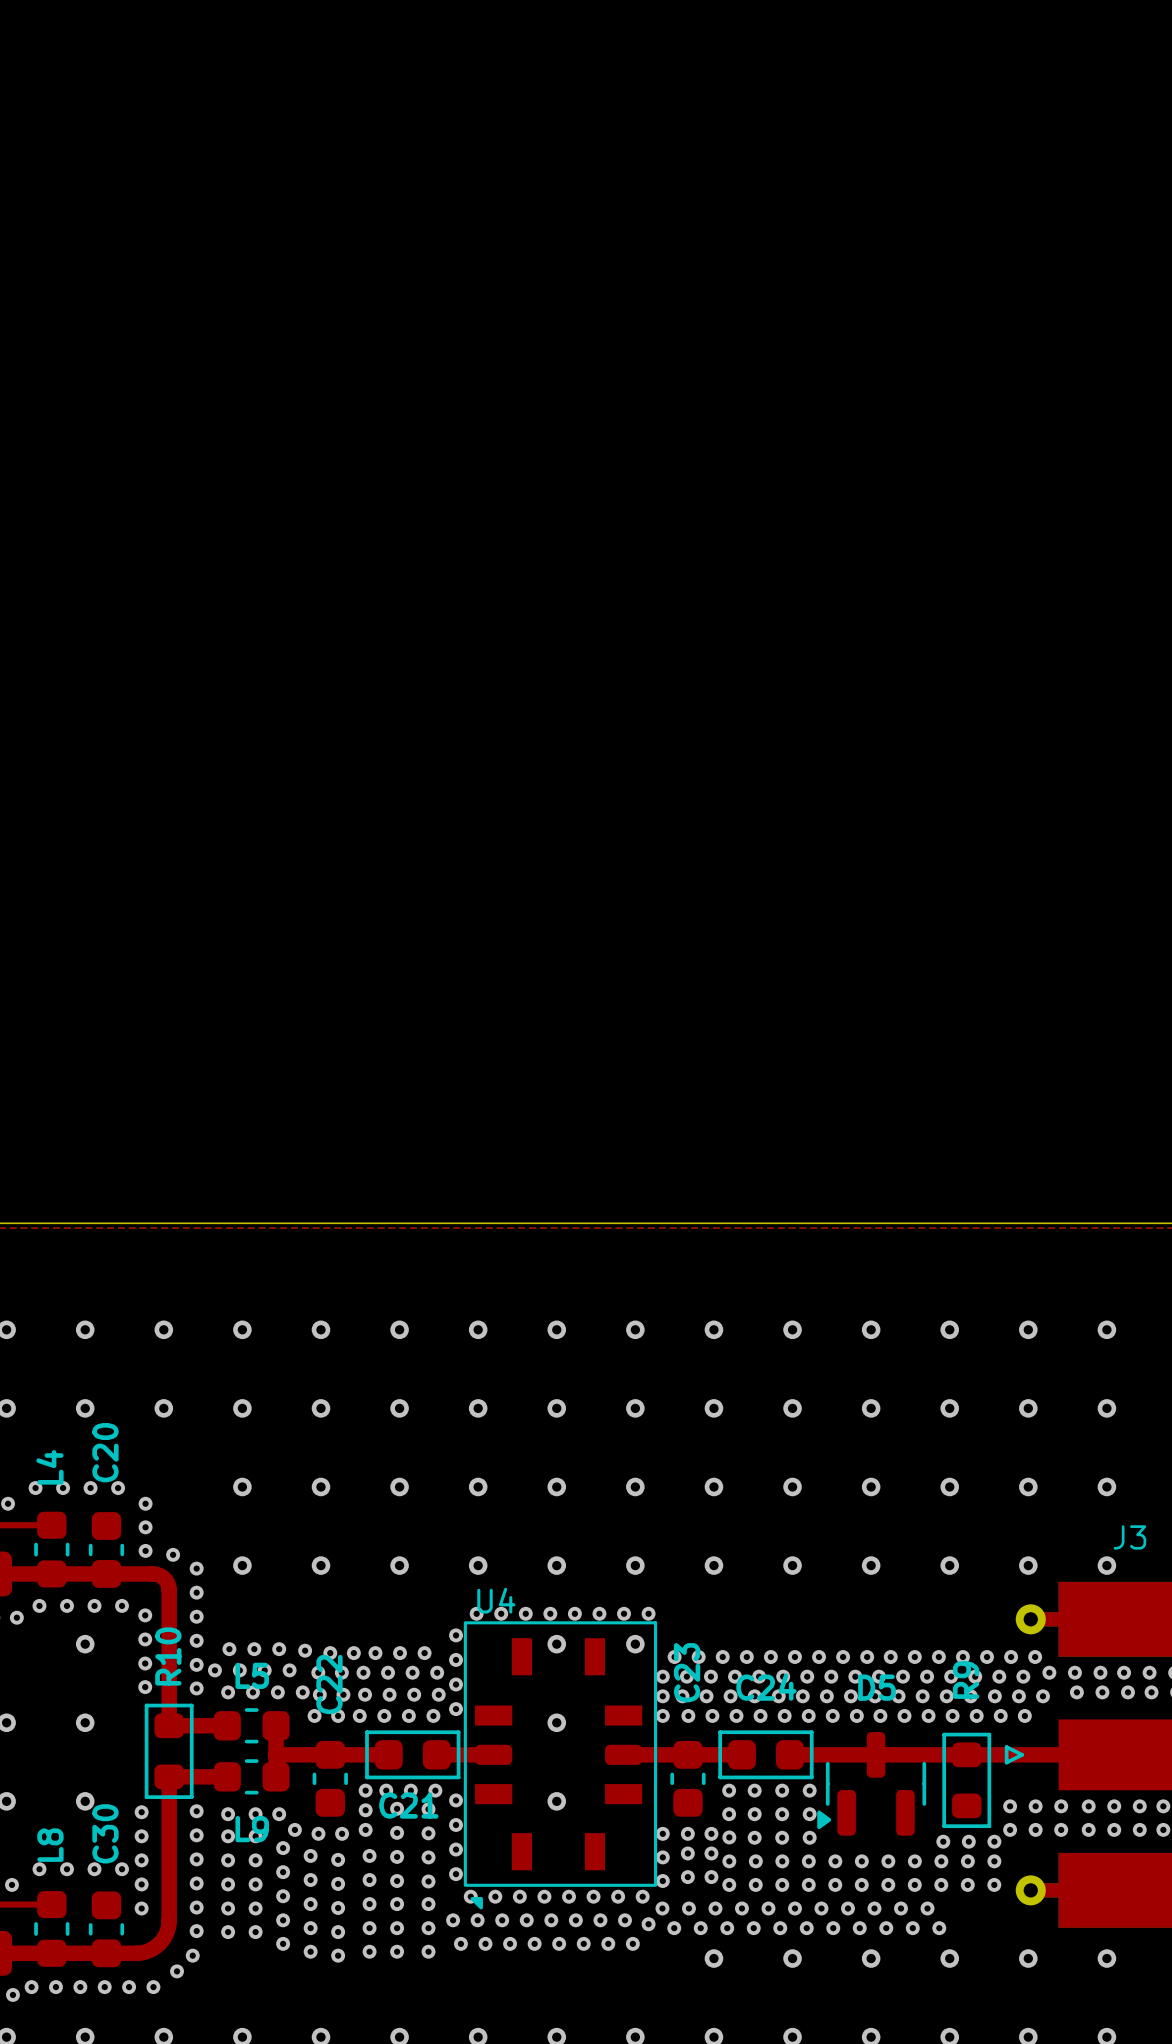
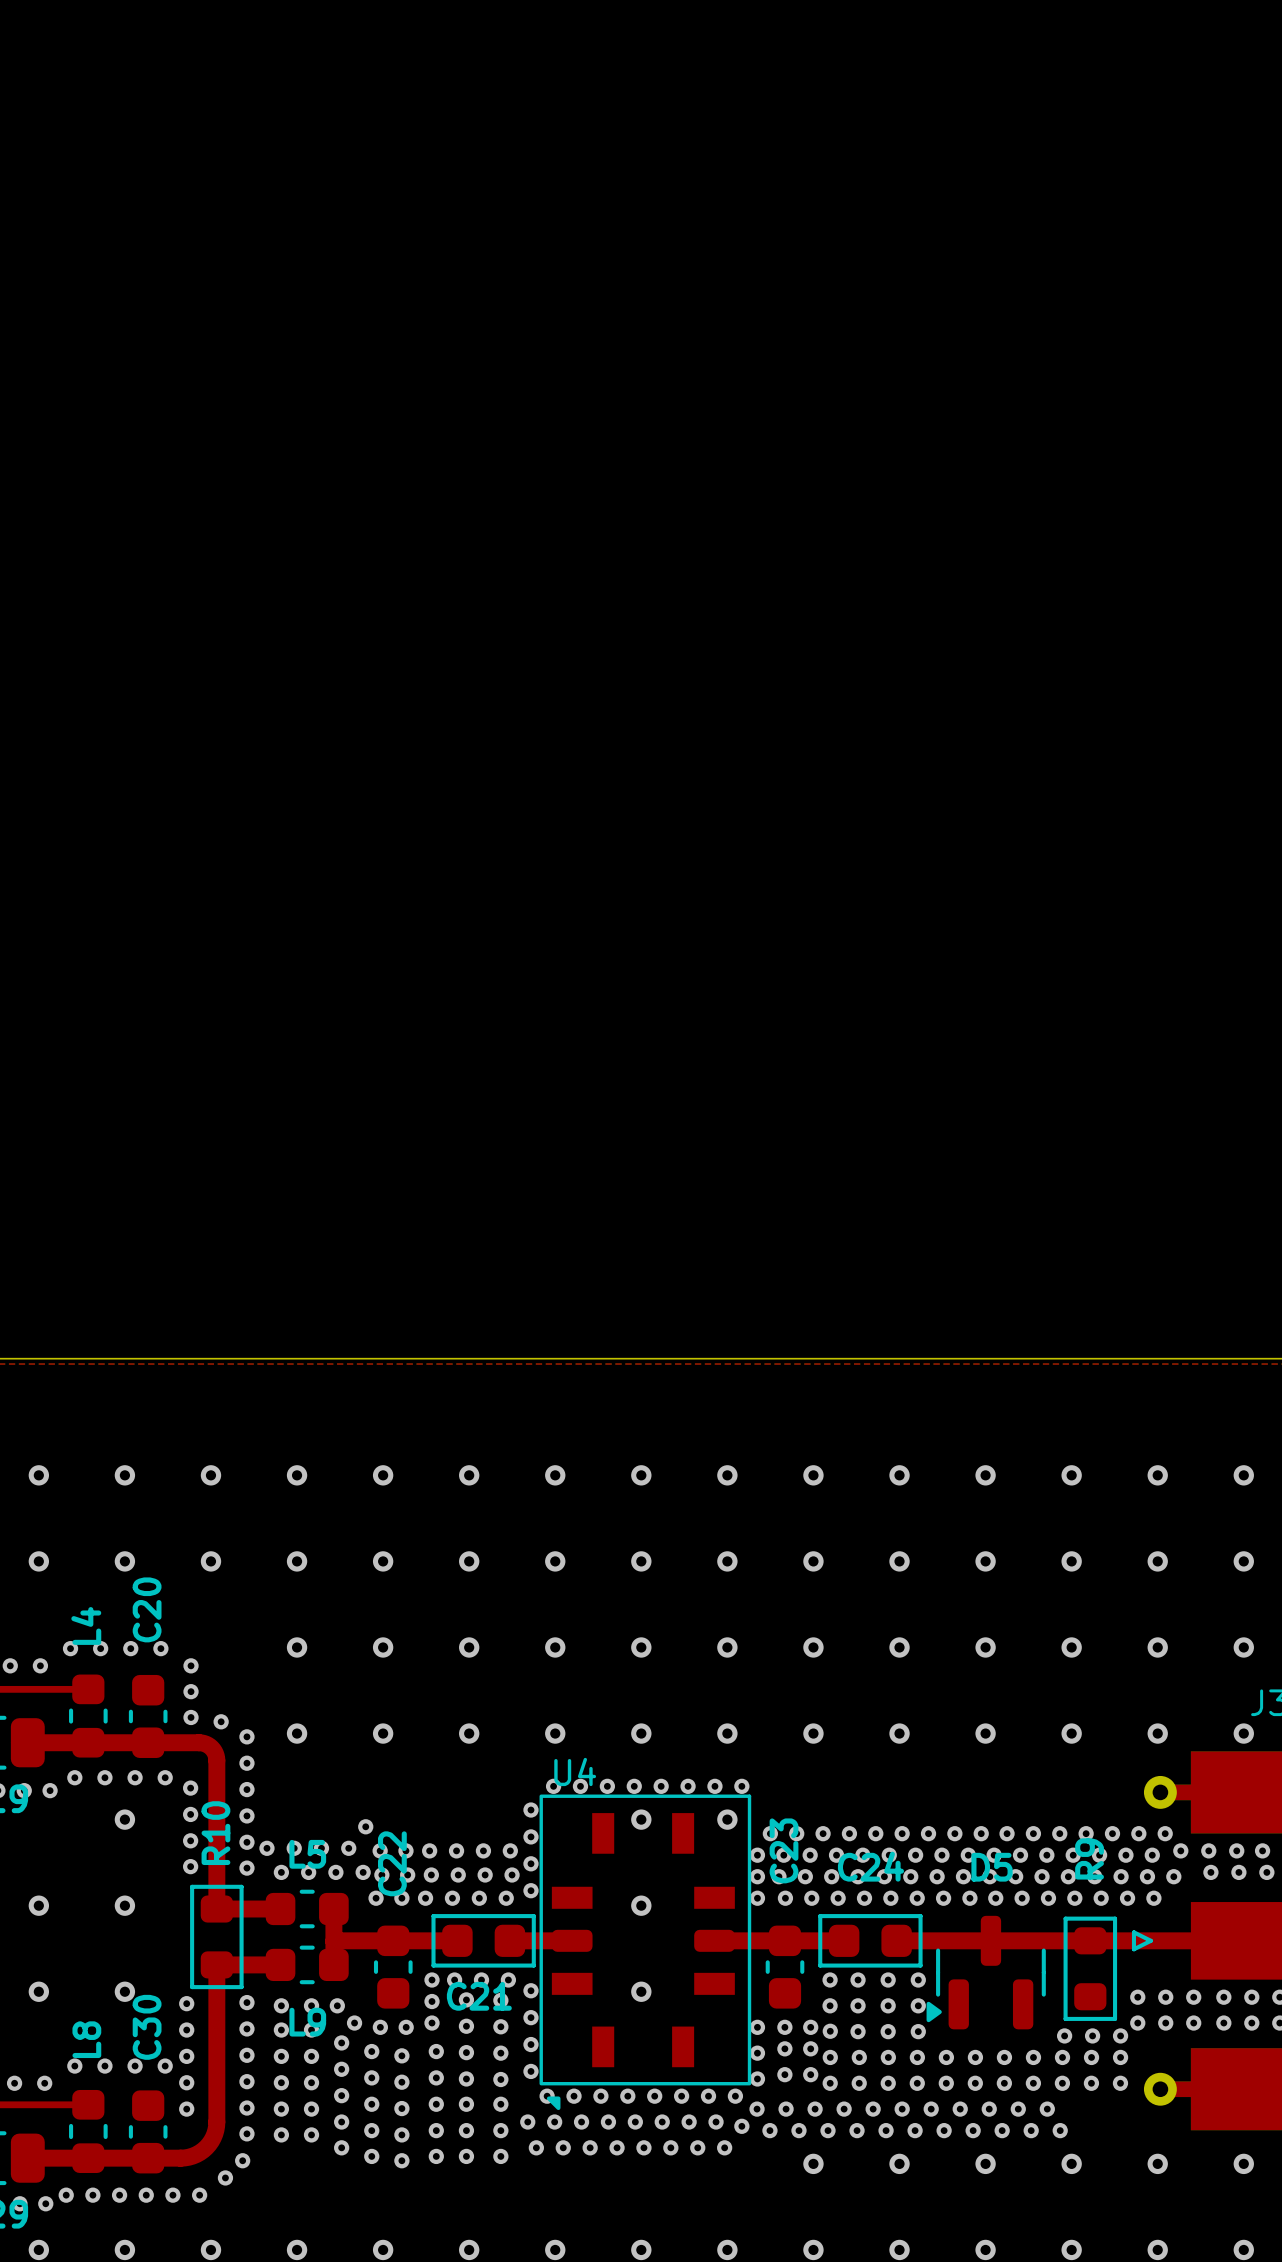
via: (229, 1649) -> none
via: (254, 1649) -> none
via: (279, 1649) -> none
via: (330, 1653) -> none
via: (353, 1653) -> none
via: (375, 1653) -> none
via: (400, 1653) -> none
via: (424, 1653) -> none

